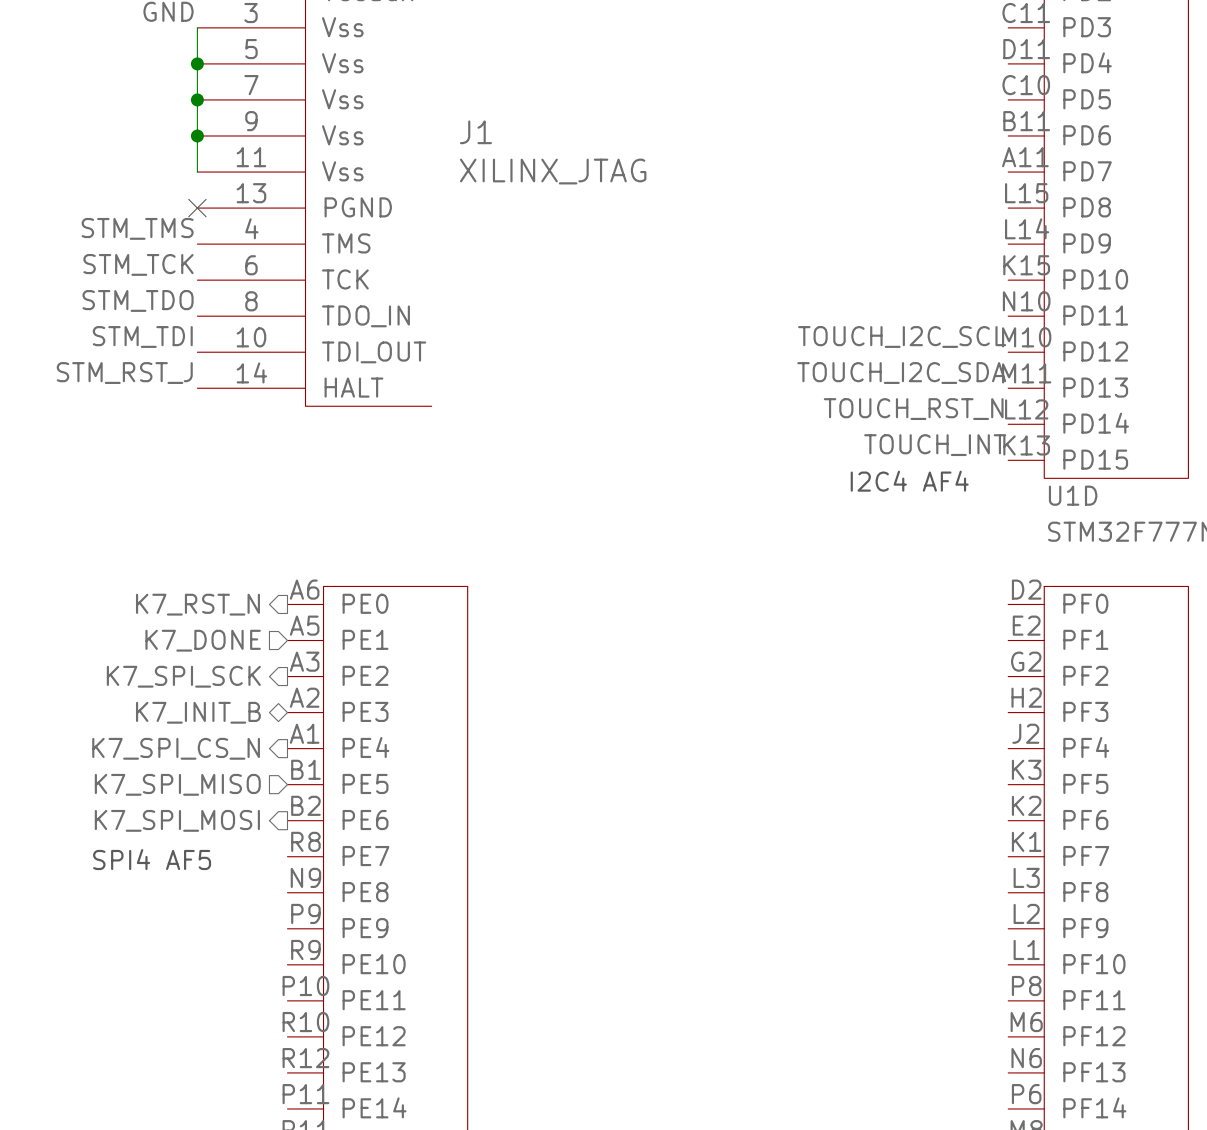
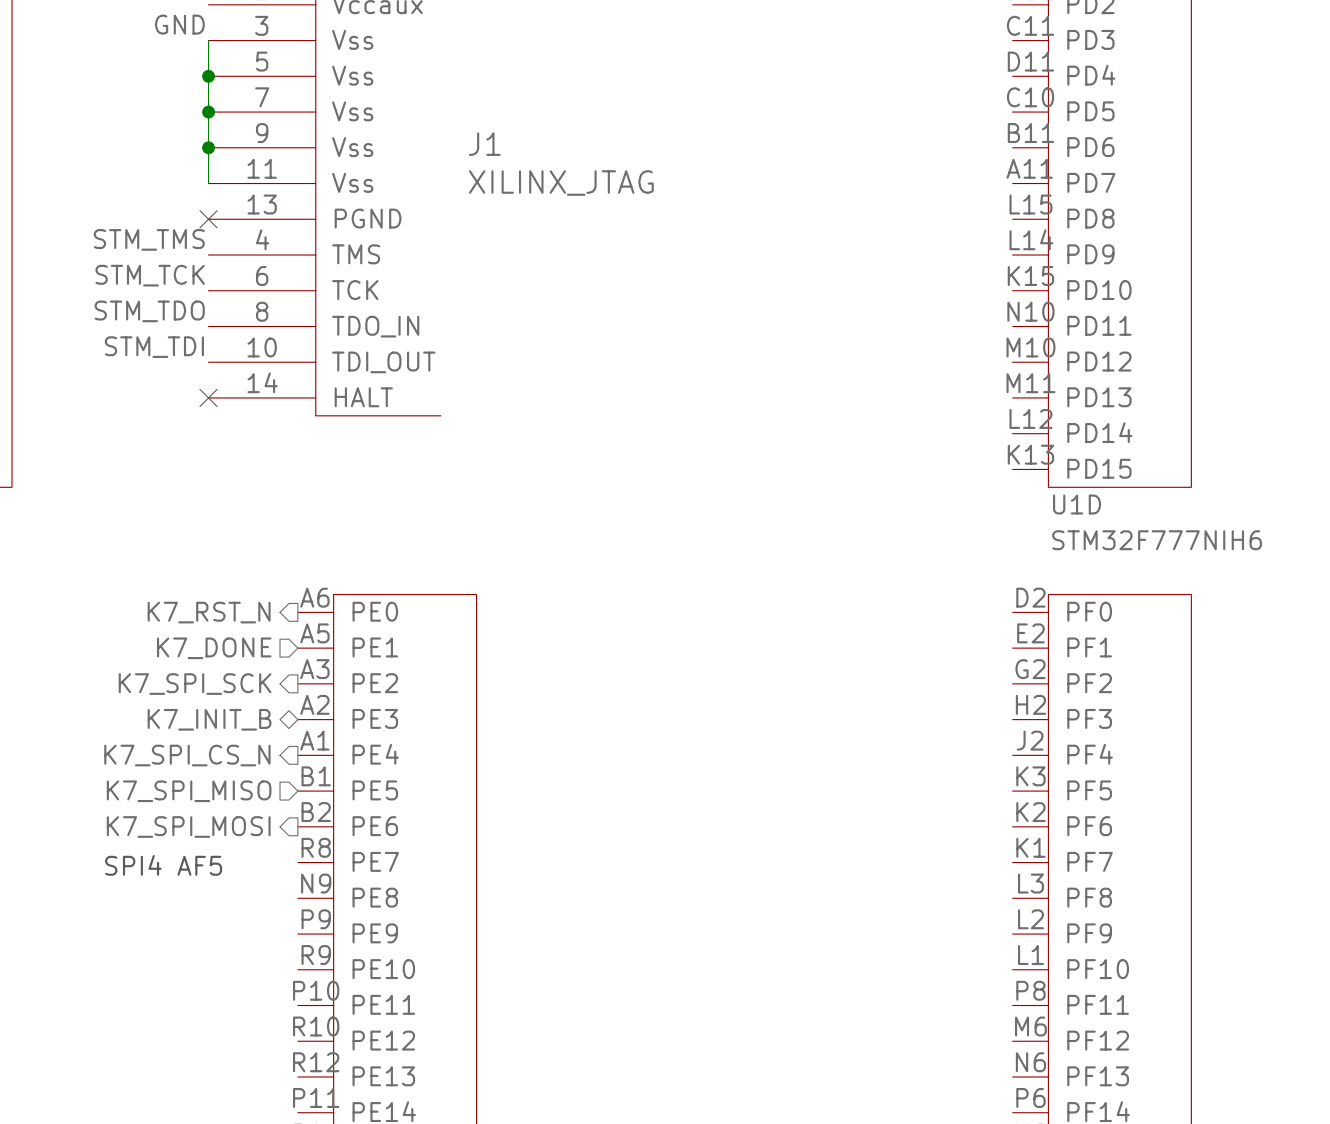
label: TOUCH_I2C_SCL (902, 336) -> none
label: STM_RST_J (124, 373) -> none
label: TOUCH_I2C_SDA (901, 373) -> none
no-connect mark: none -> (208, 397)
label: TOUCH_RST_N (913, 409) -> none
label: TOUCH_INT (935, 445) -> none
text: I2C4 AF4 (909, 481) -> none

